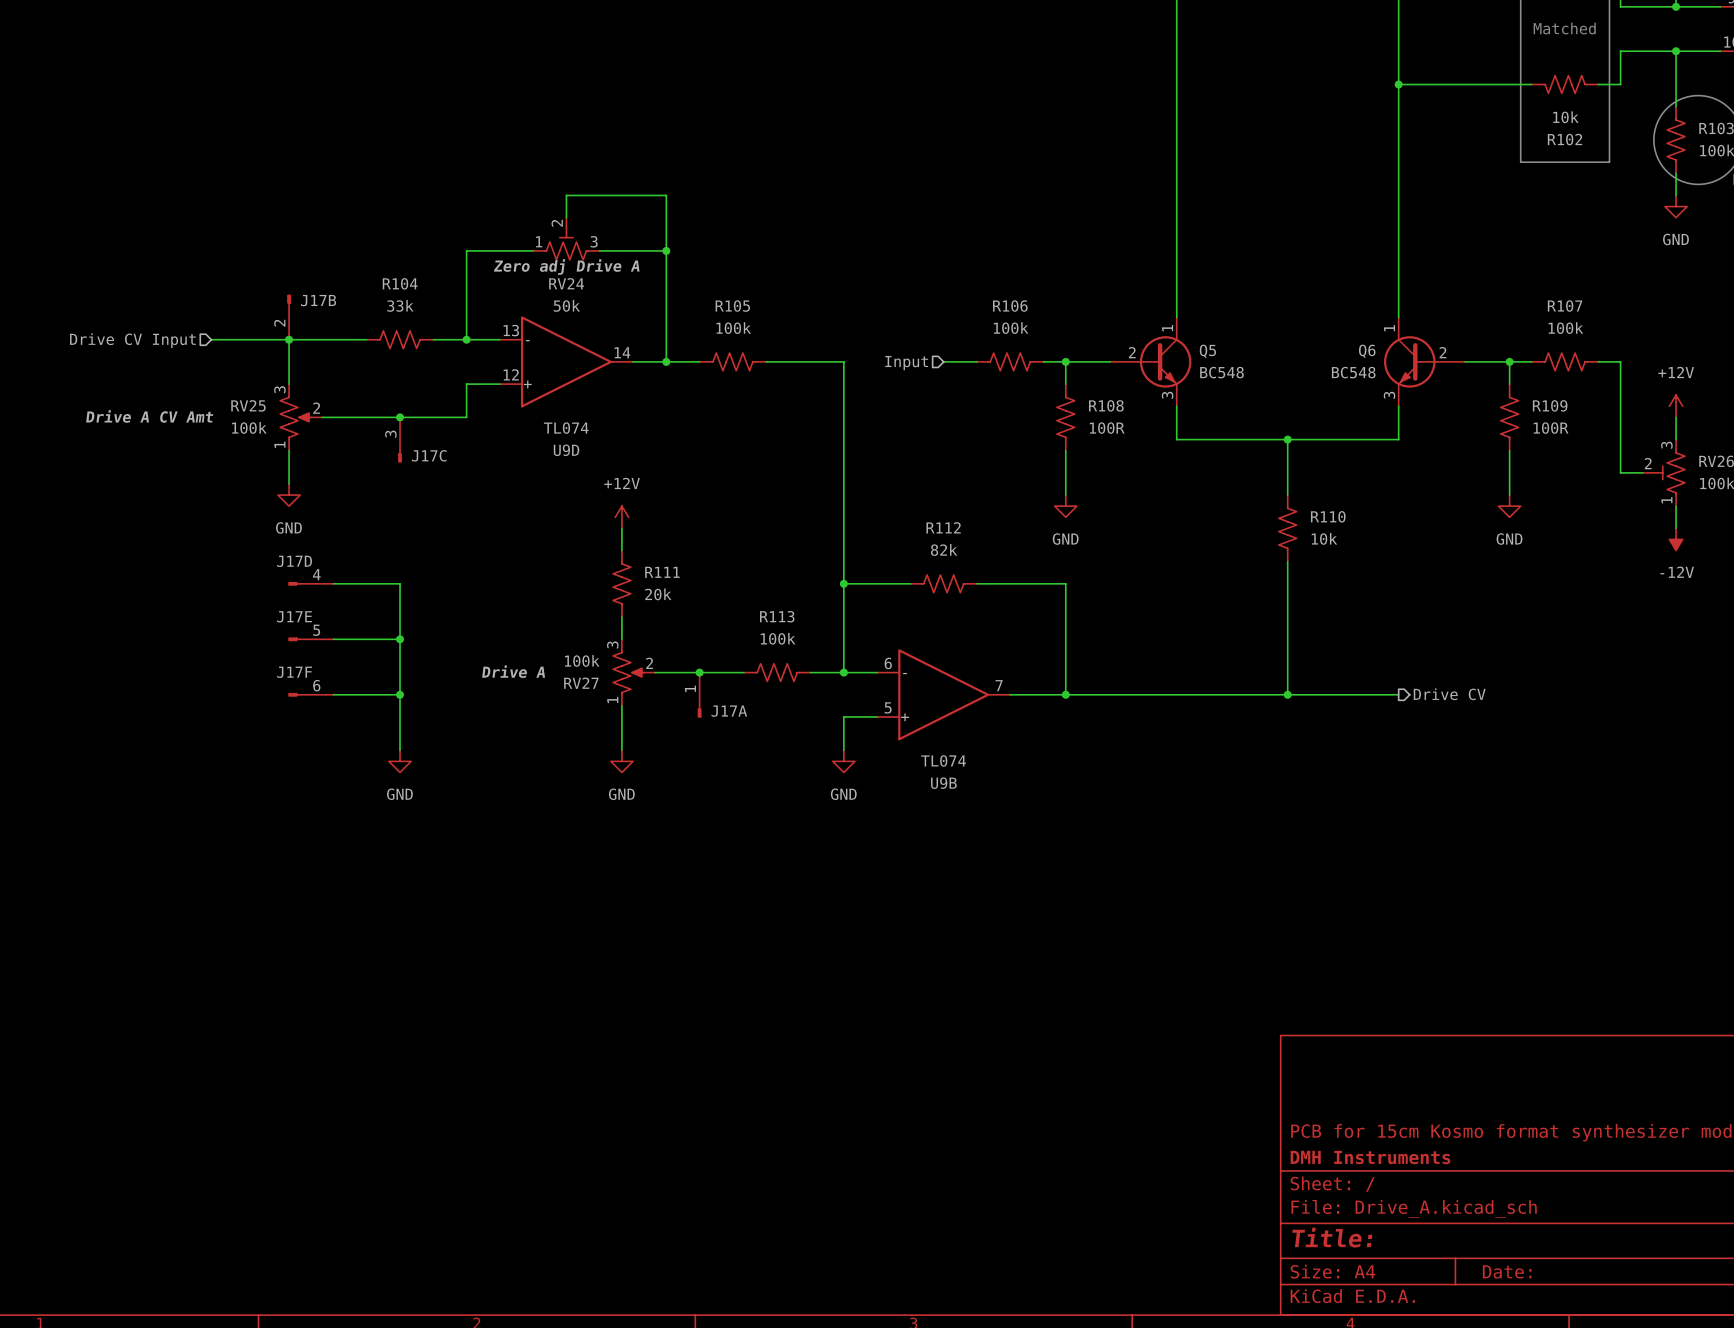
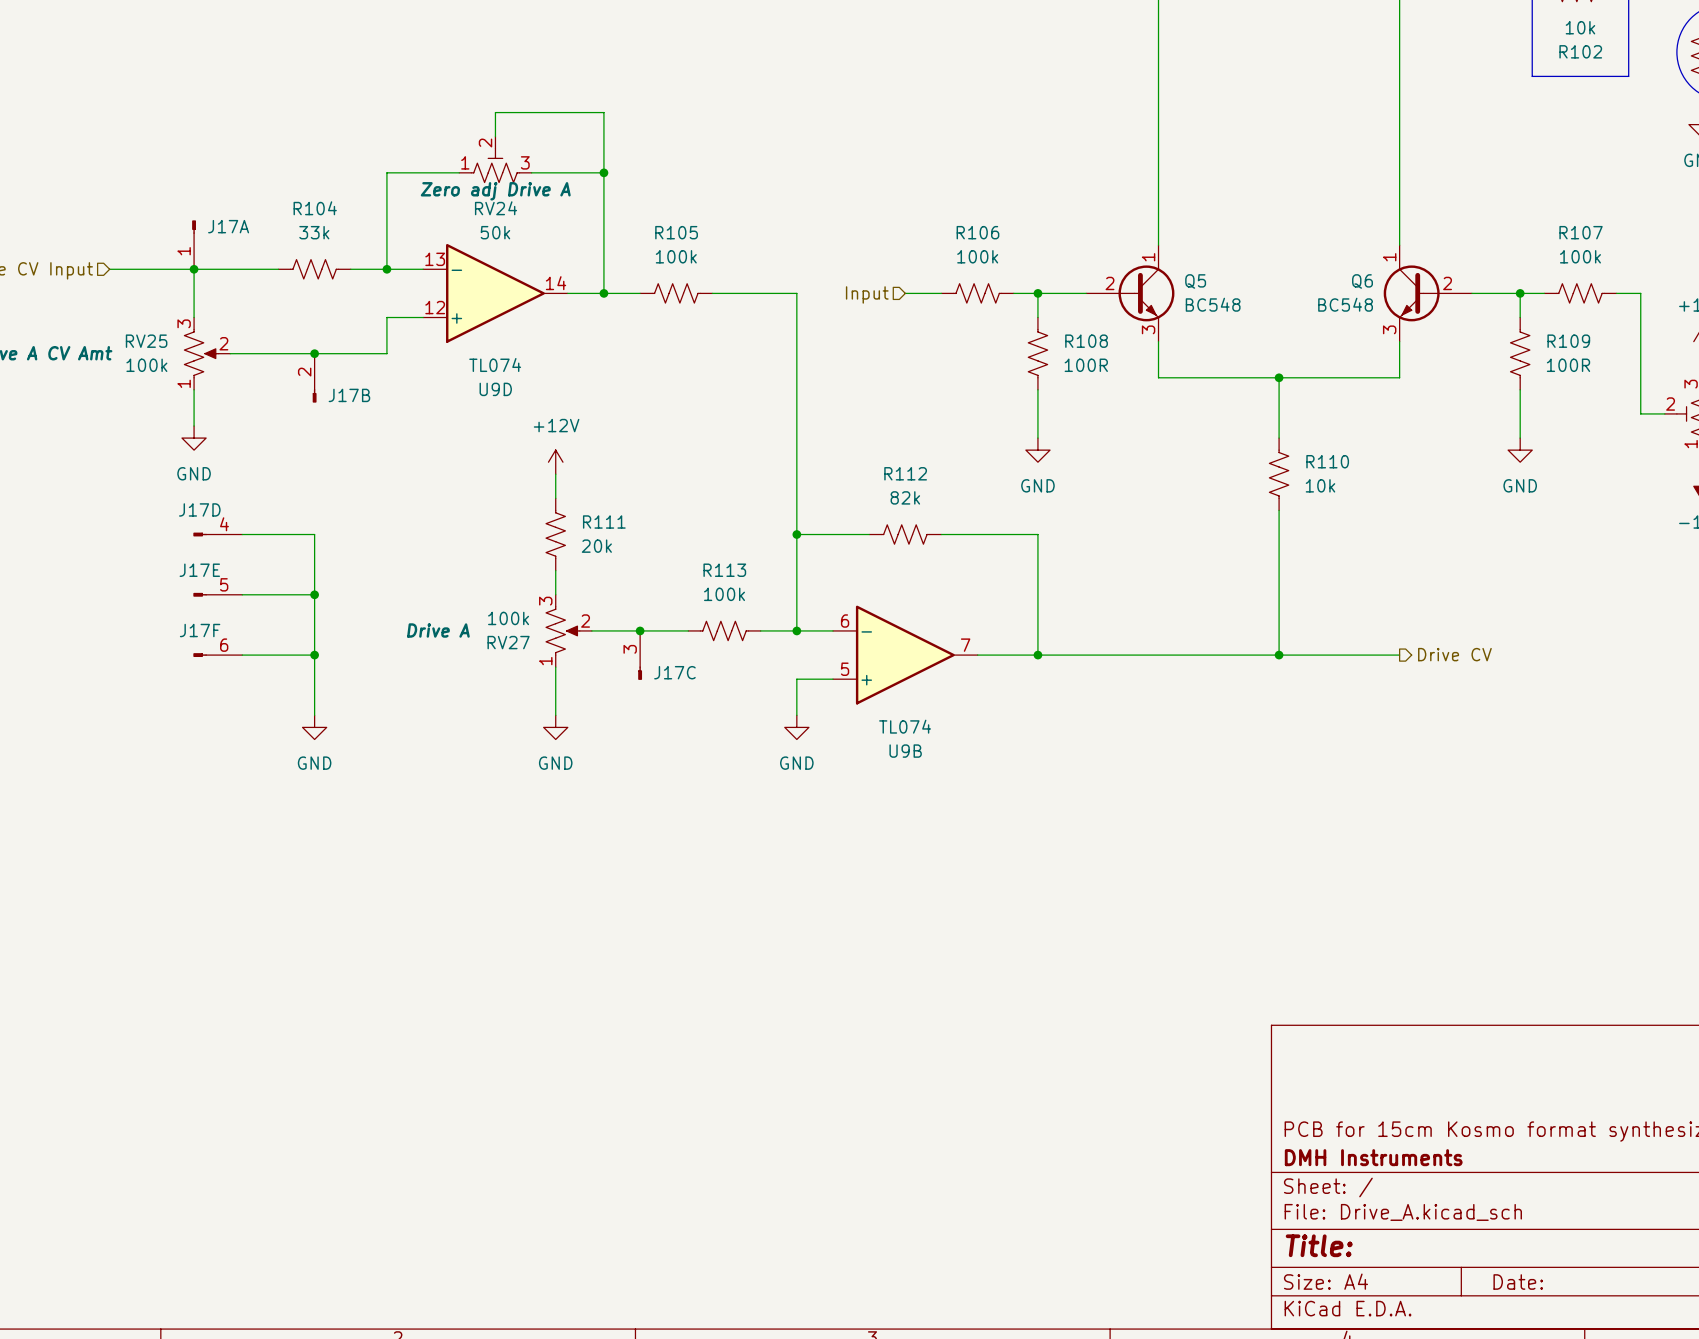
J17B rotation: 0° (289, 300) -> 180° (314, 395)
J17B name position: J17B (318, 300) -> J17B (349, 395)
J17B position: (289, 317) -> (314, 378)
J17C position: (400, 439) -> (640, 655)
J17A position: (699, 695) -> (194, 244)
J17A rotation: 0° (699, 711) -> 180° (194, 227)
J17A name position: J17A (729, 711) -> J17A (228, 226)

